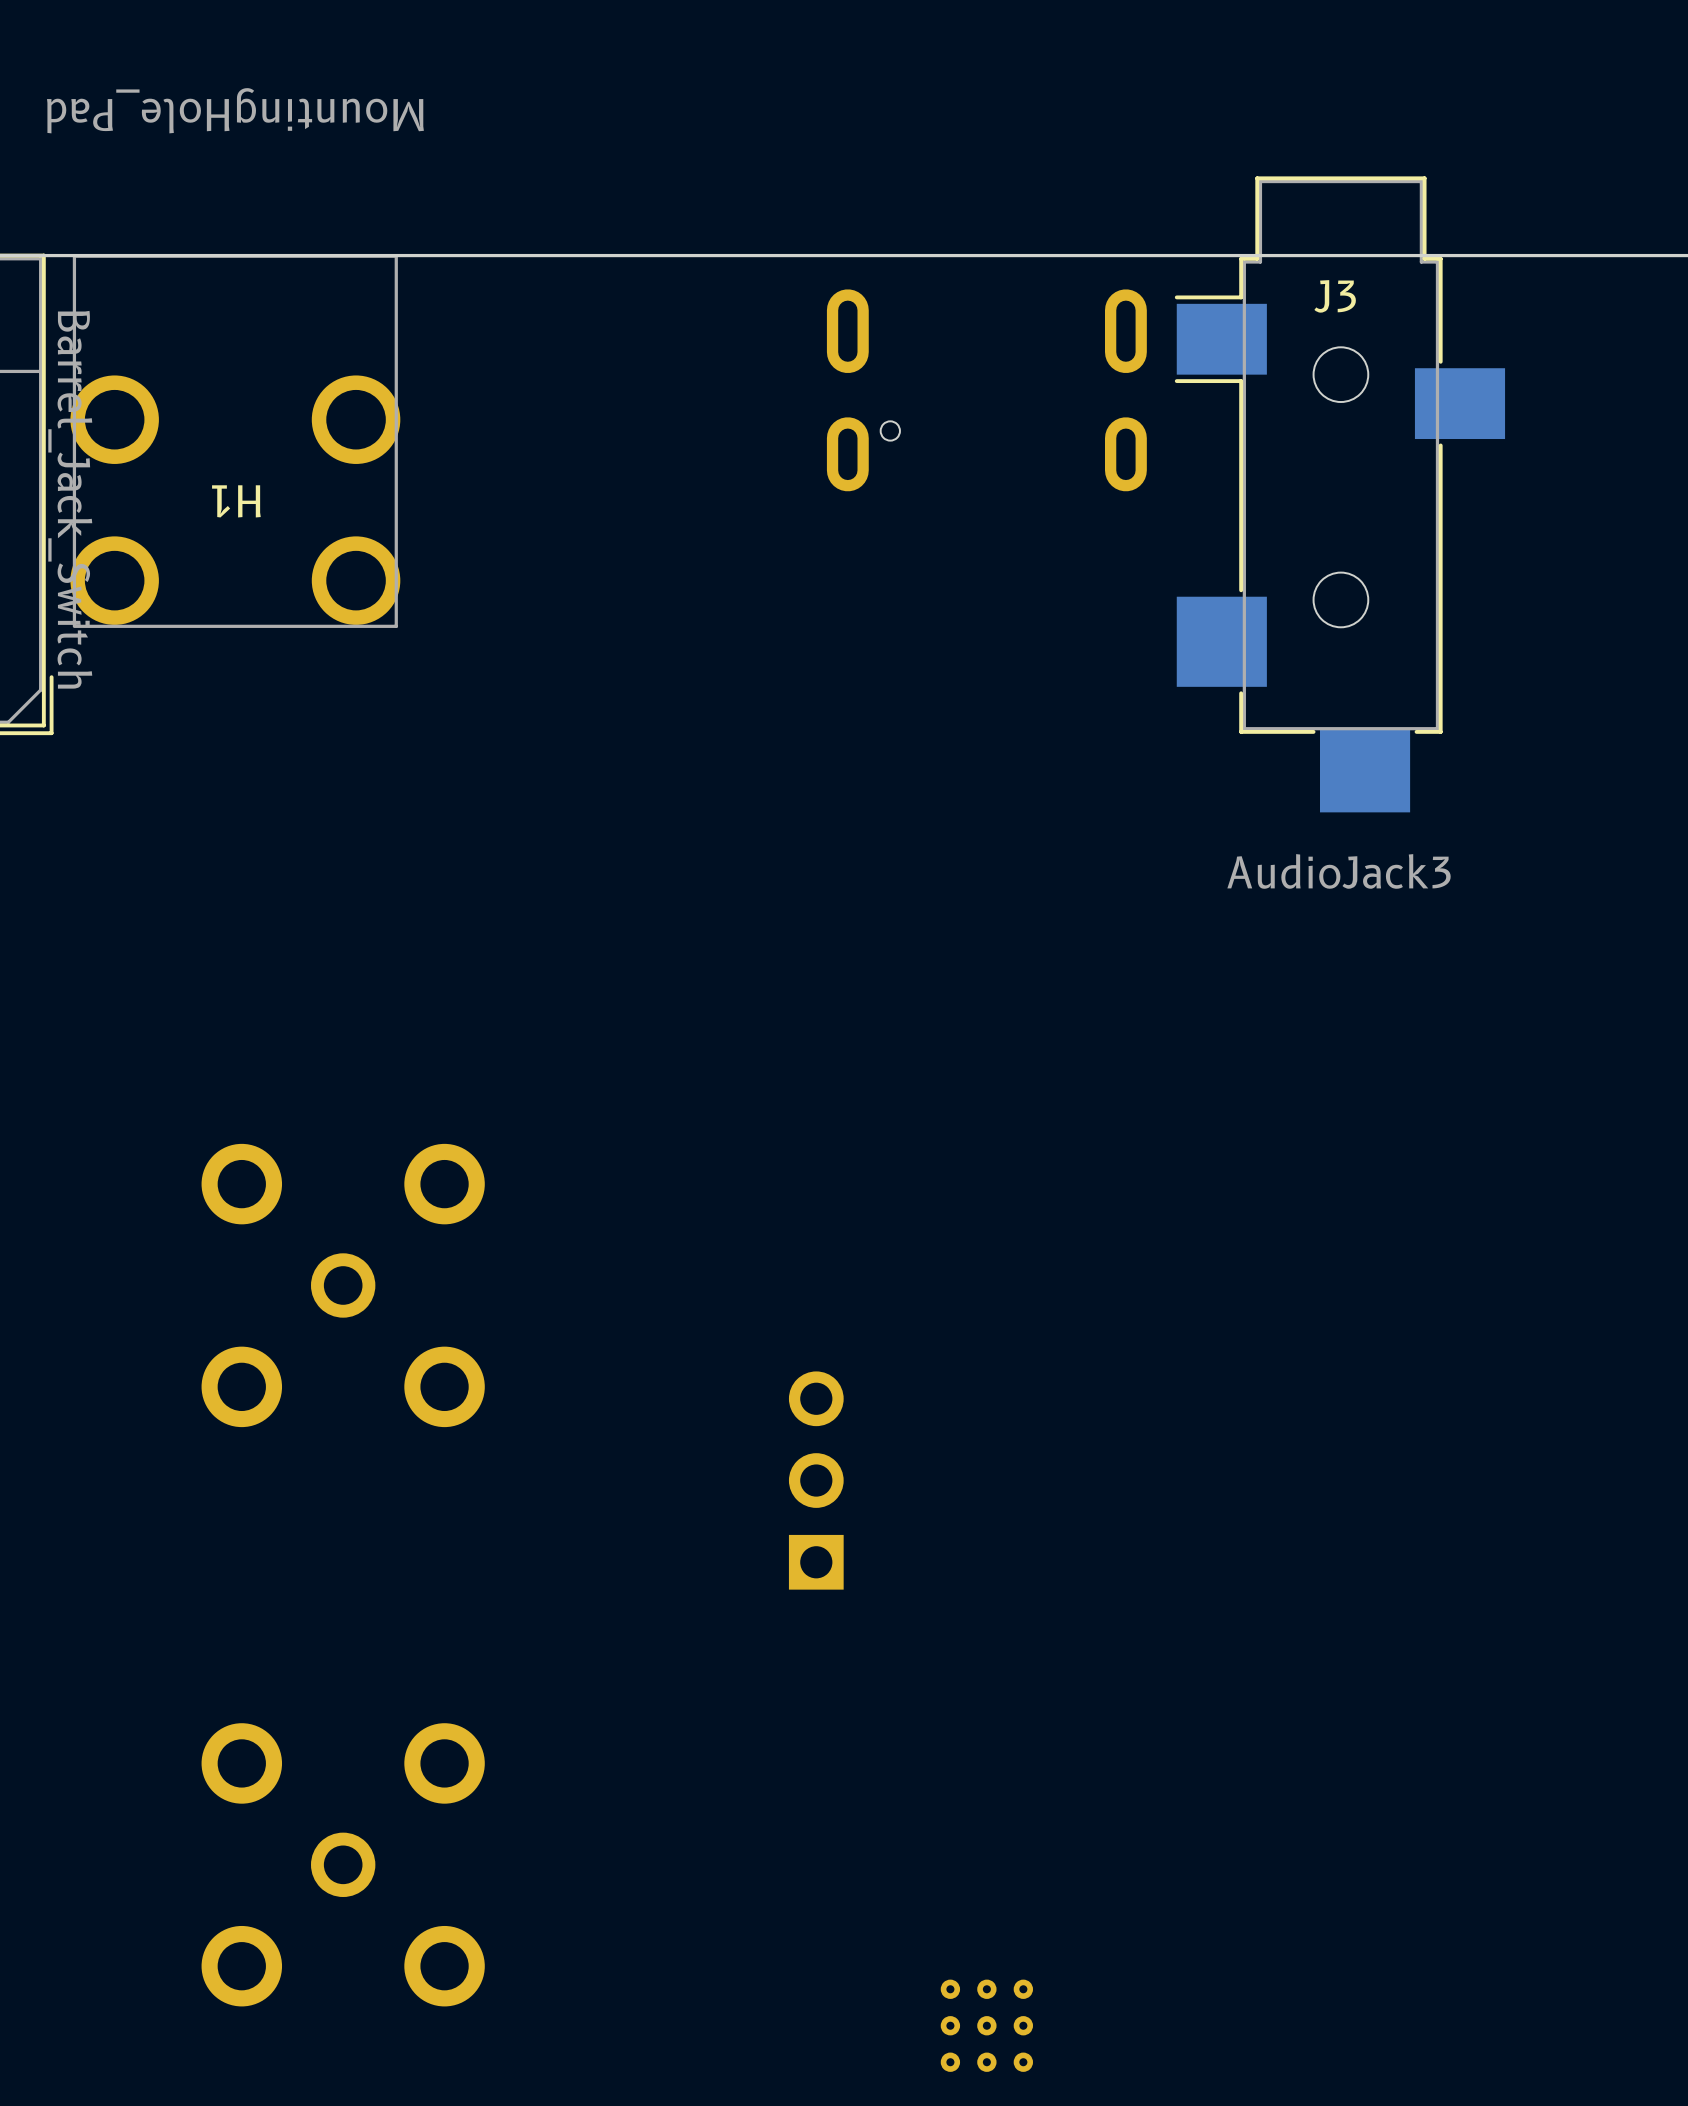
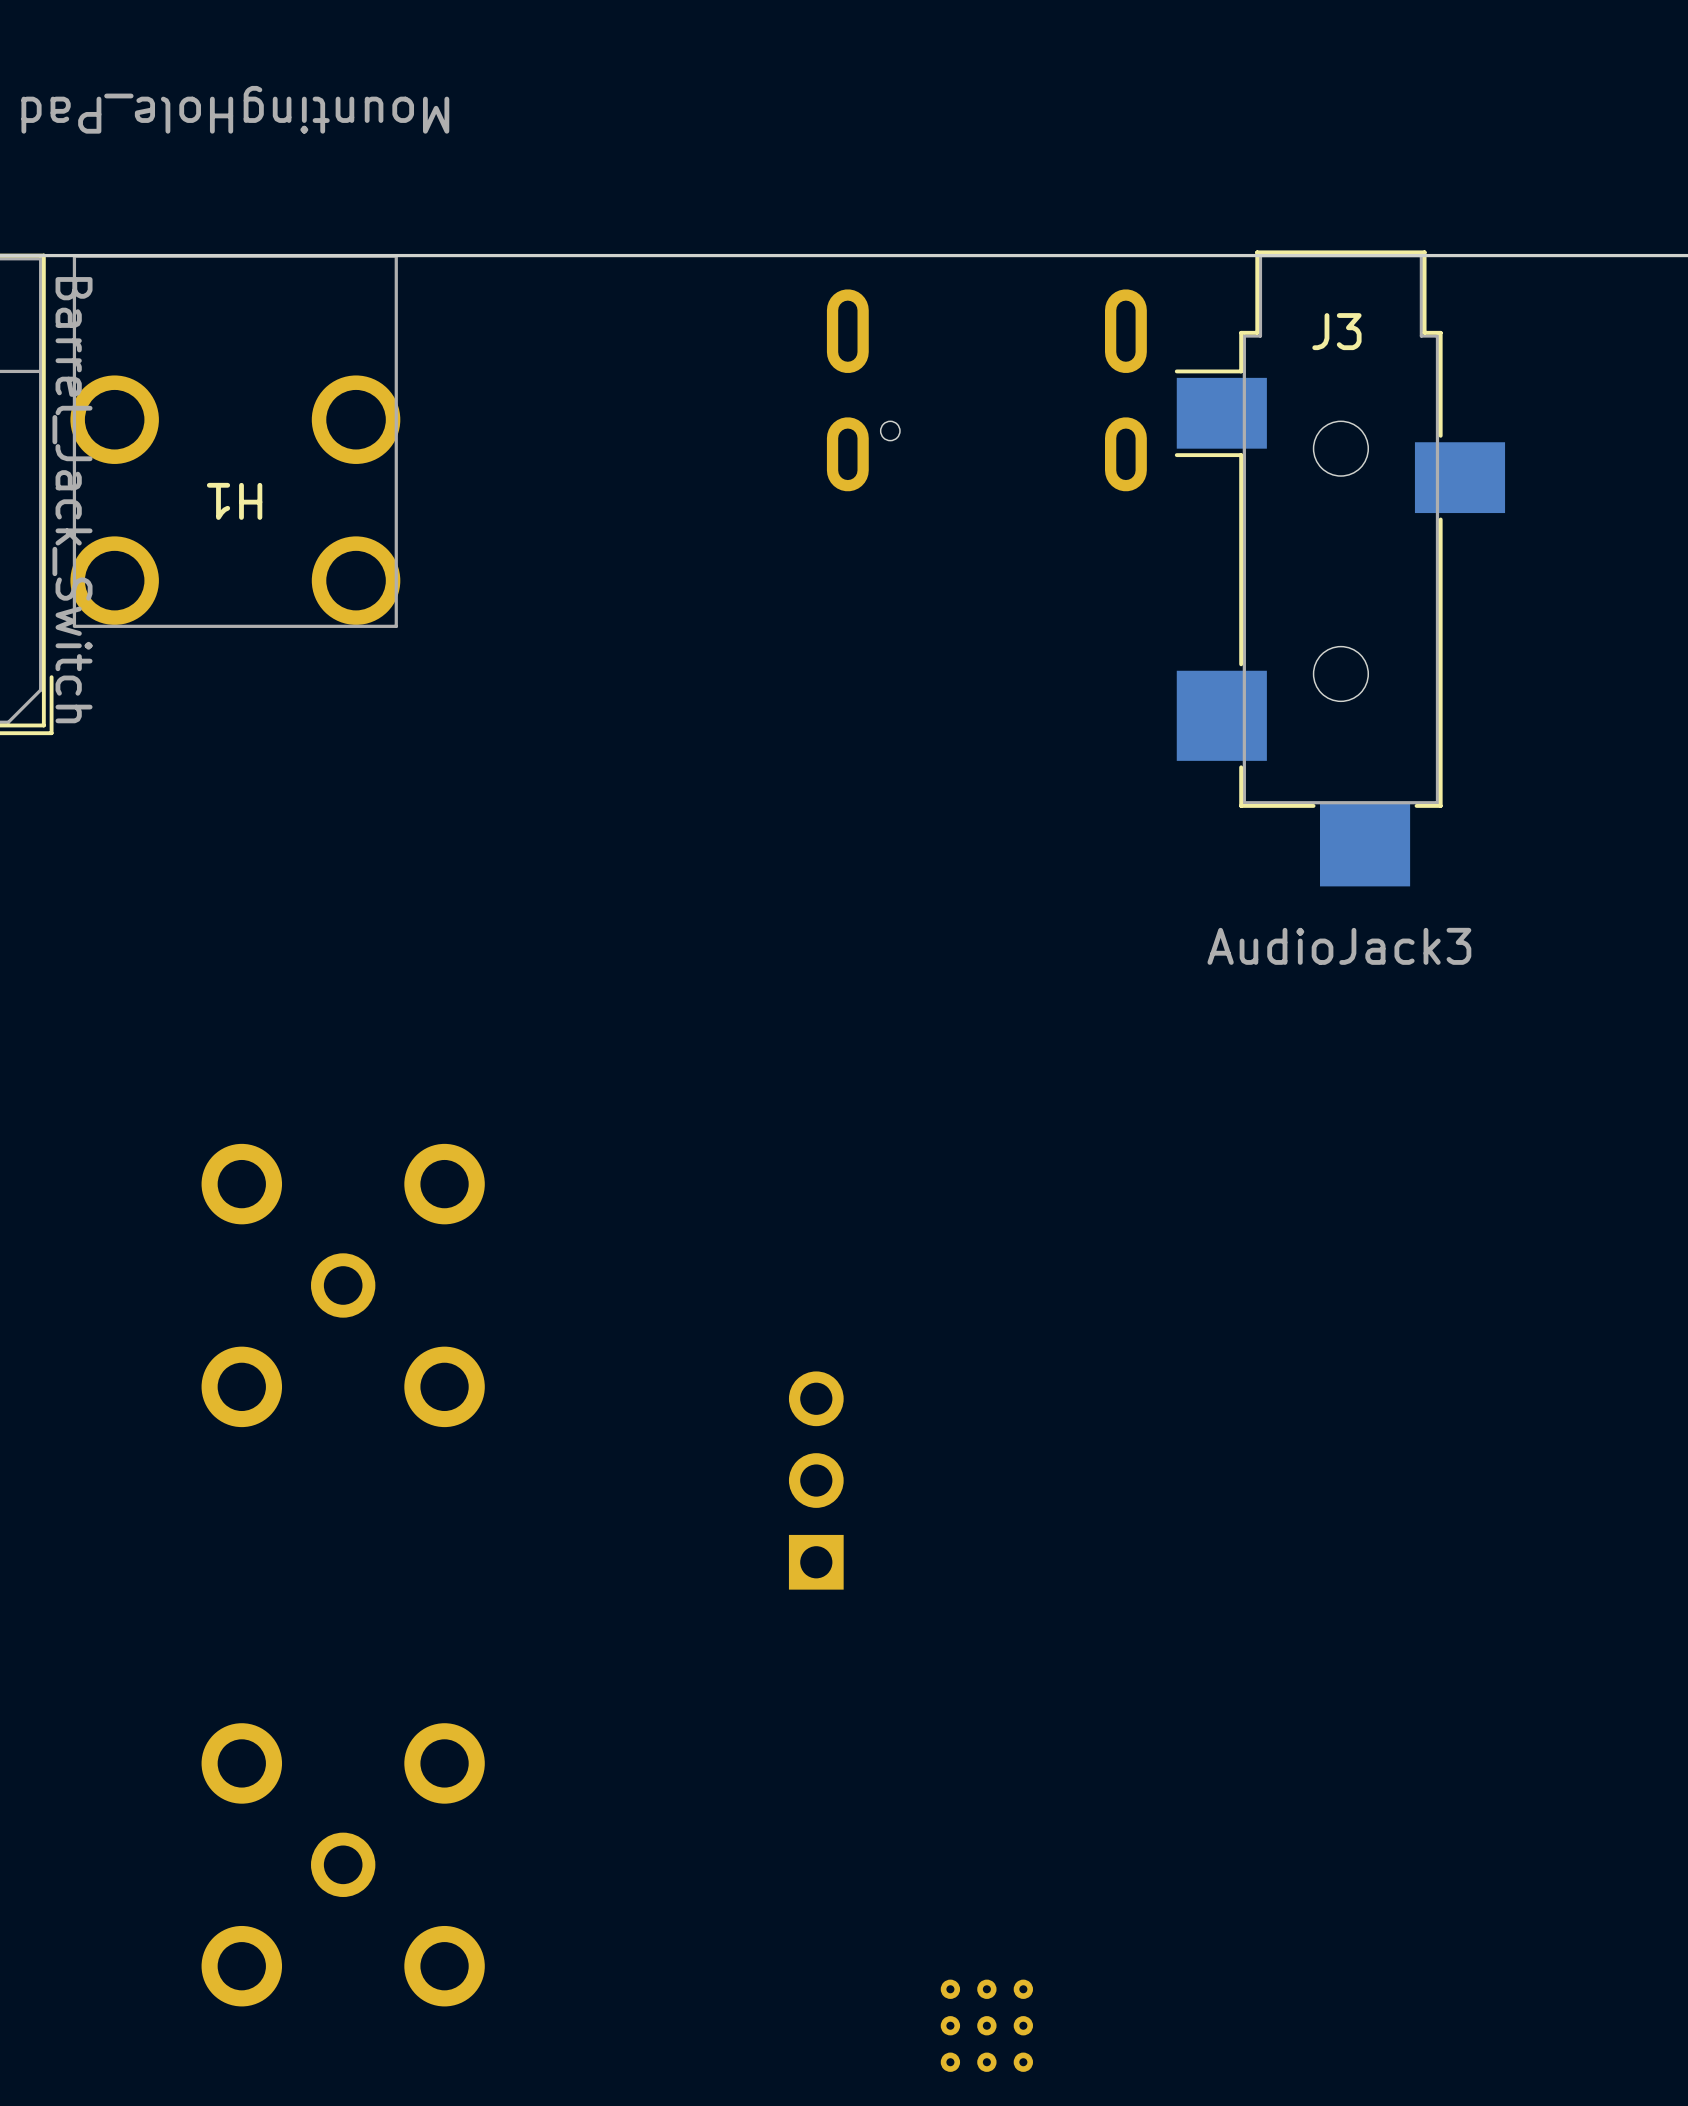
J3 name position: J3 (1335, 296) -> J3 (1336, 331)
J3 position: (1339, 494) -> (1339, 568)

